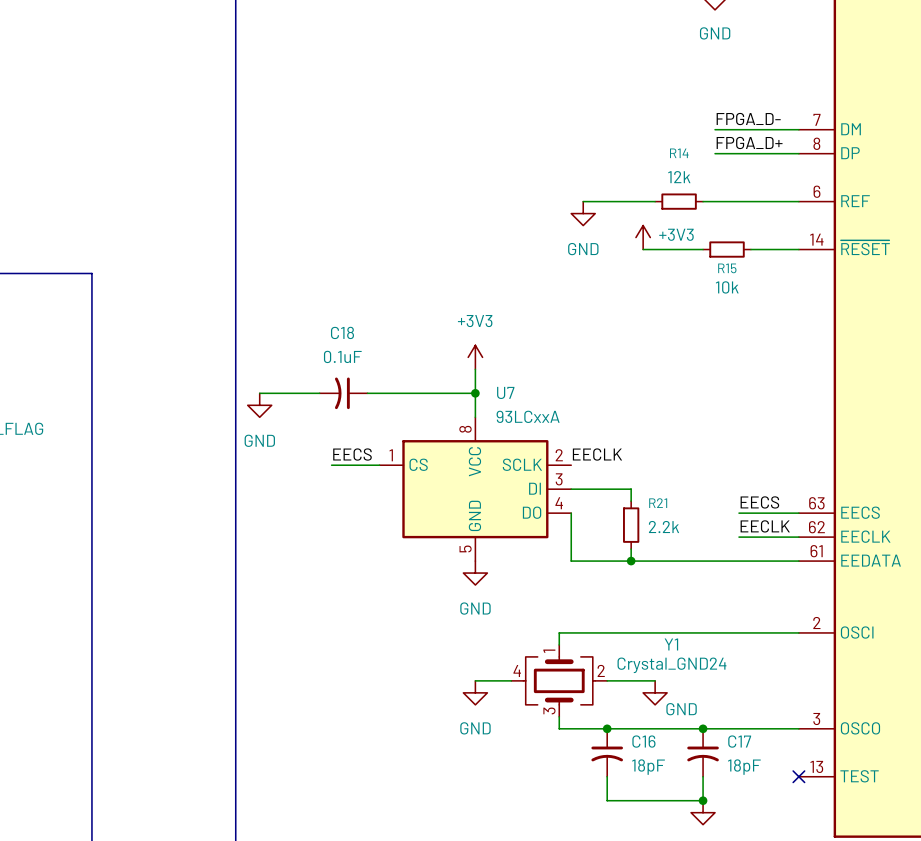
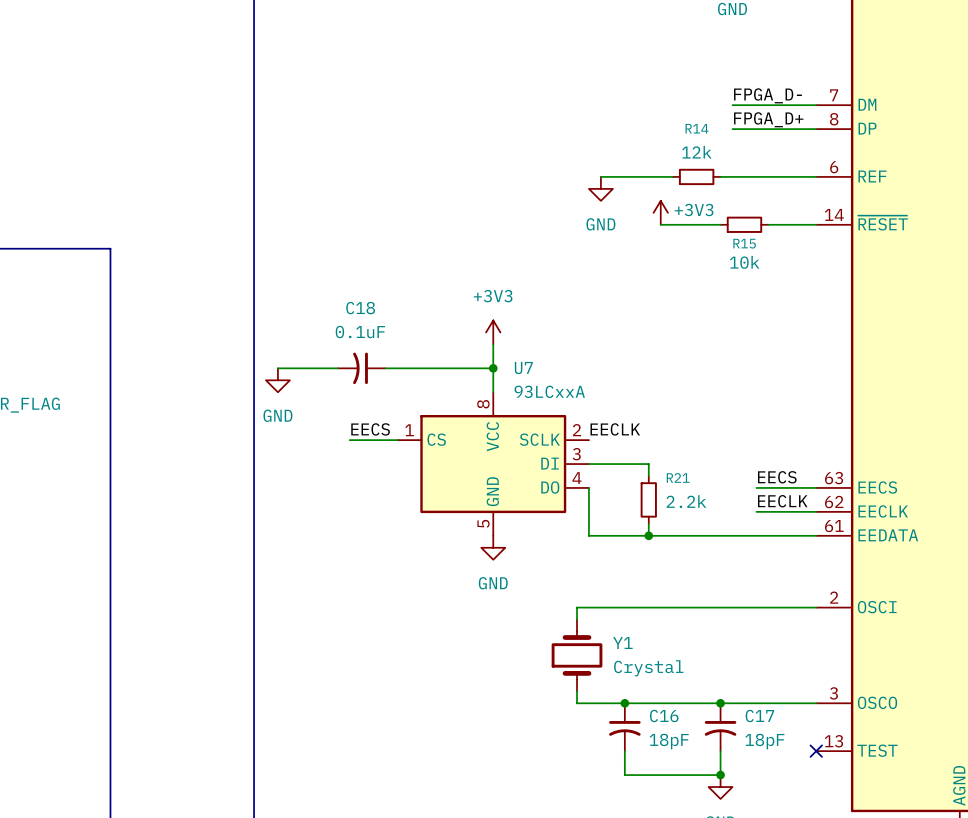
Y1 symbol: [511, 644, 608, 717] -> [551, 619, 603, 692]
Y1 name position: Y1 (671, 644) -> Y1 (622, 643)
Y1 value: Crystal_GND24 (671, 665) -> Crystal (648, 668)
wire: (475, 680) (511, 680) -> none
wire: (607, 680) (655, 680) -> none
power symbol: GND (475, 692) -> none
power symbol: GND (655, 692) -> none

